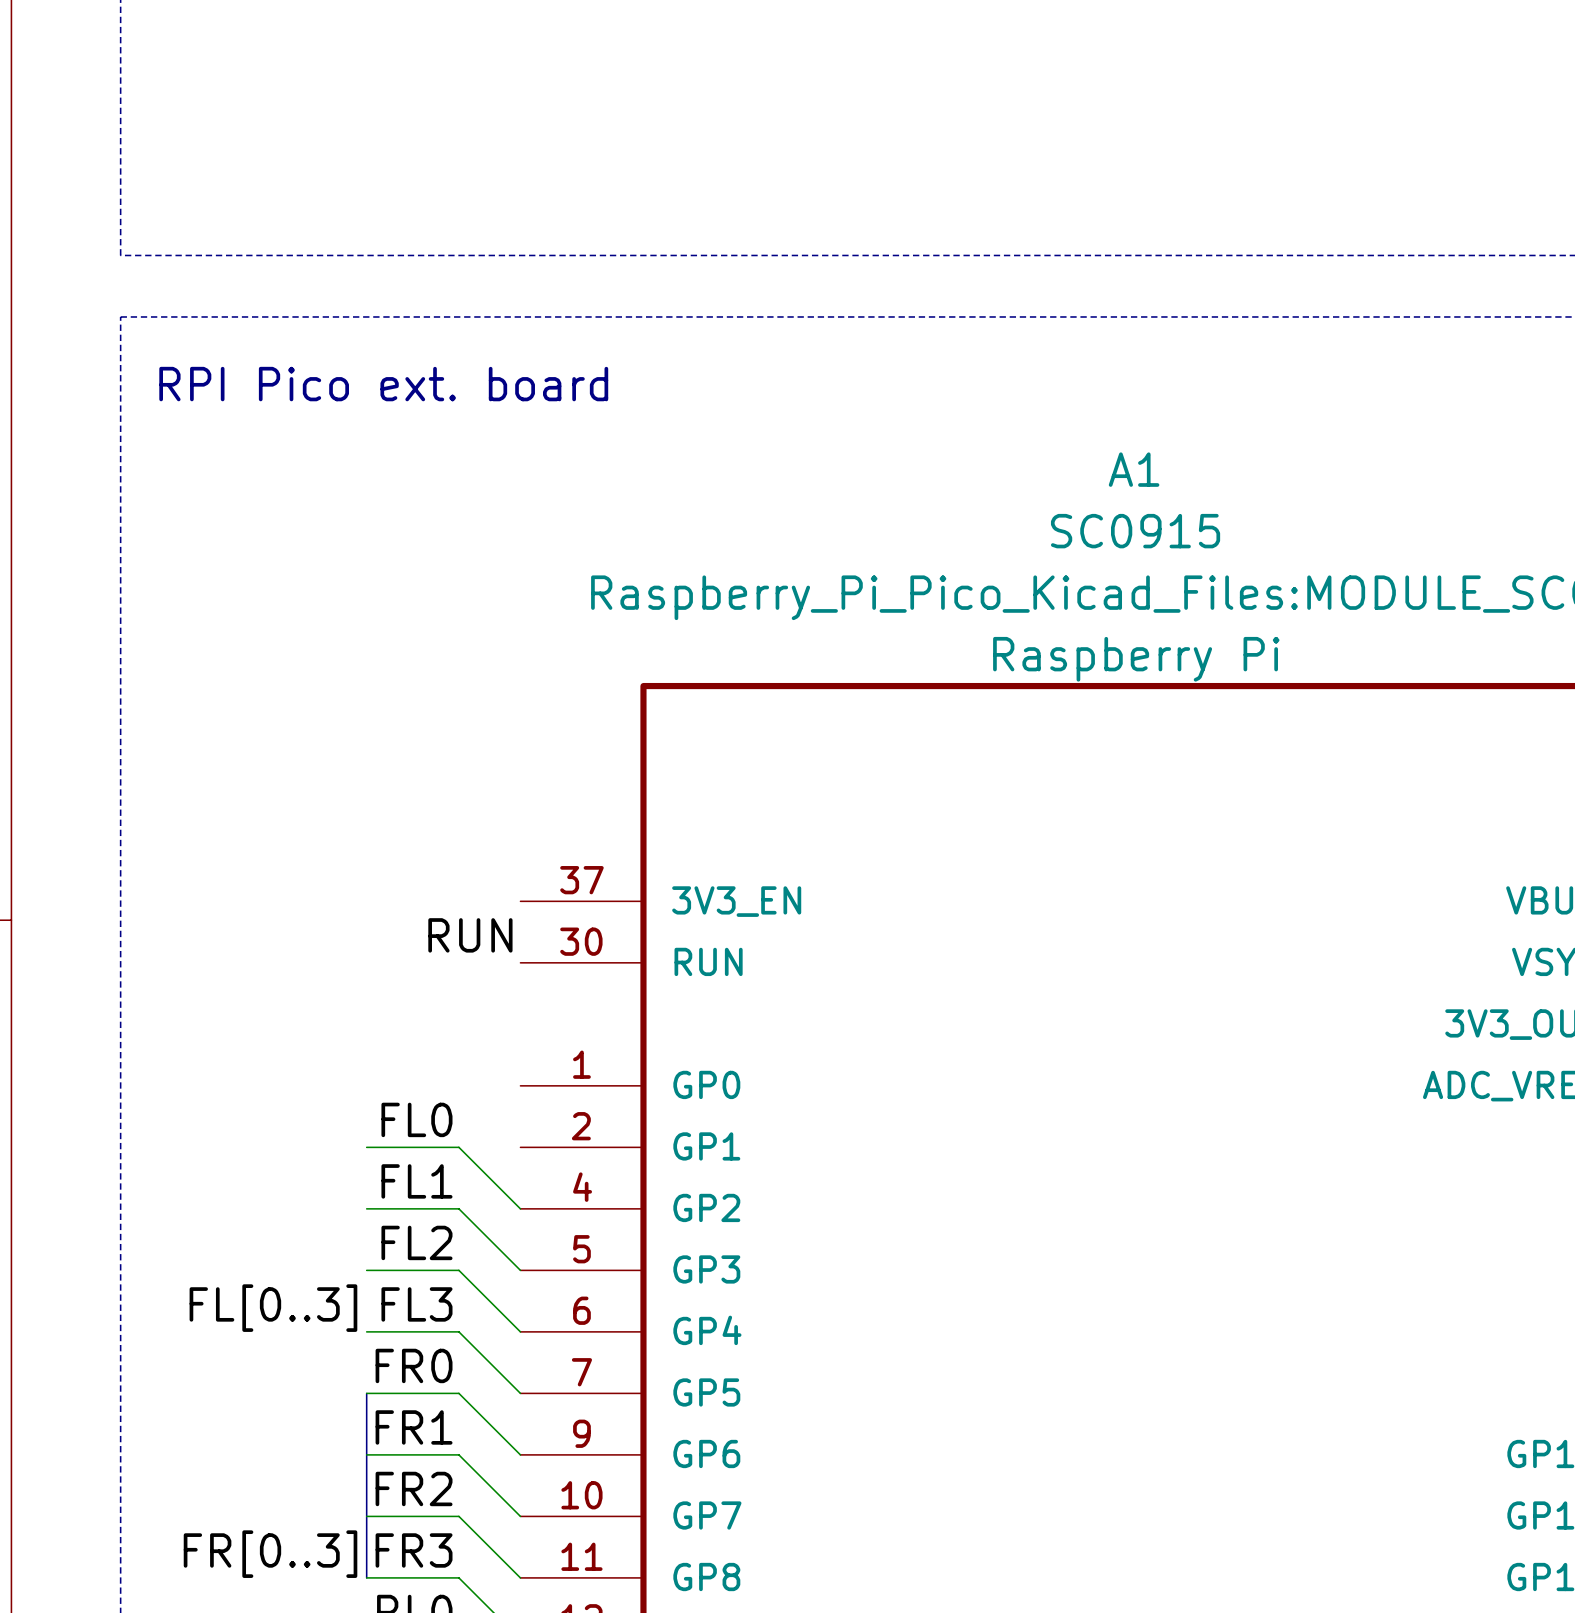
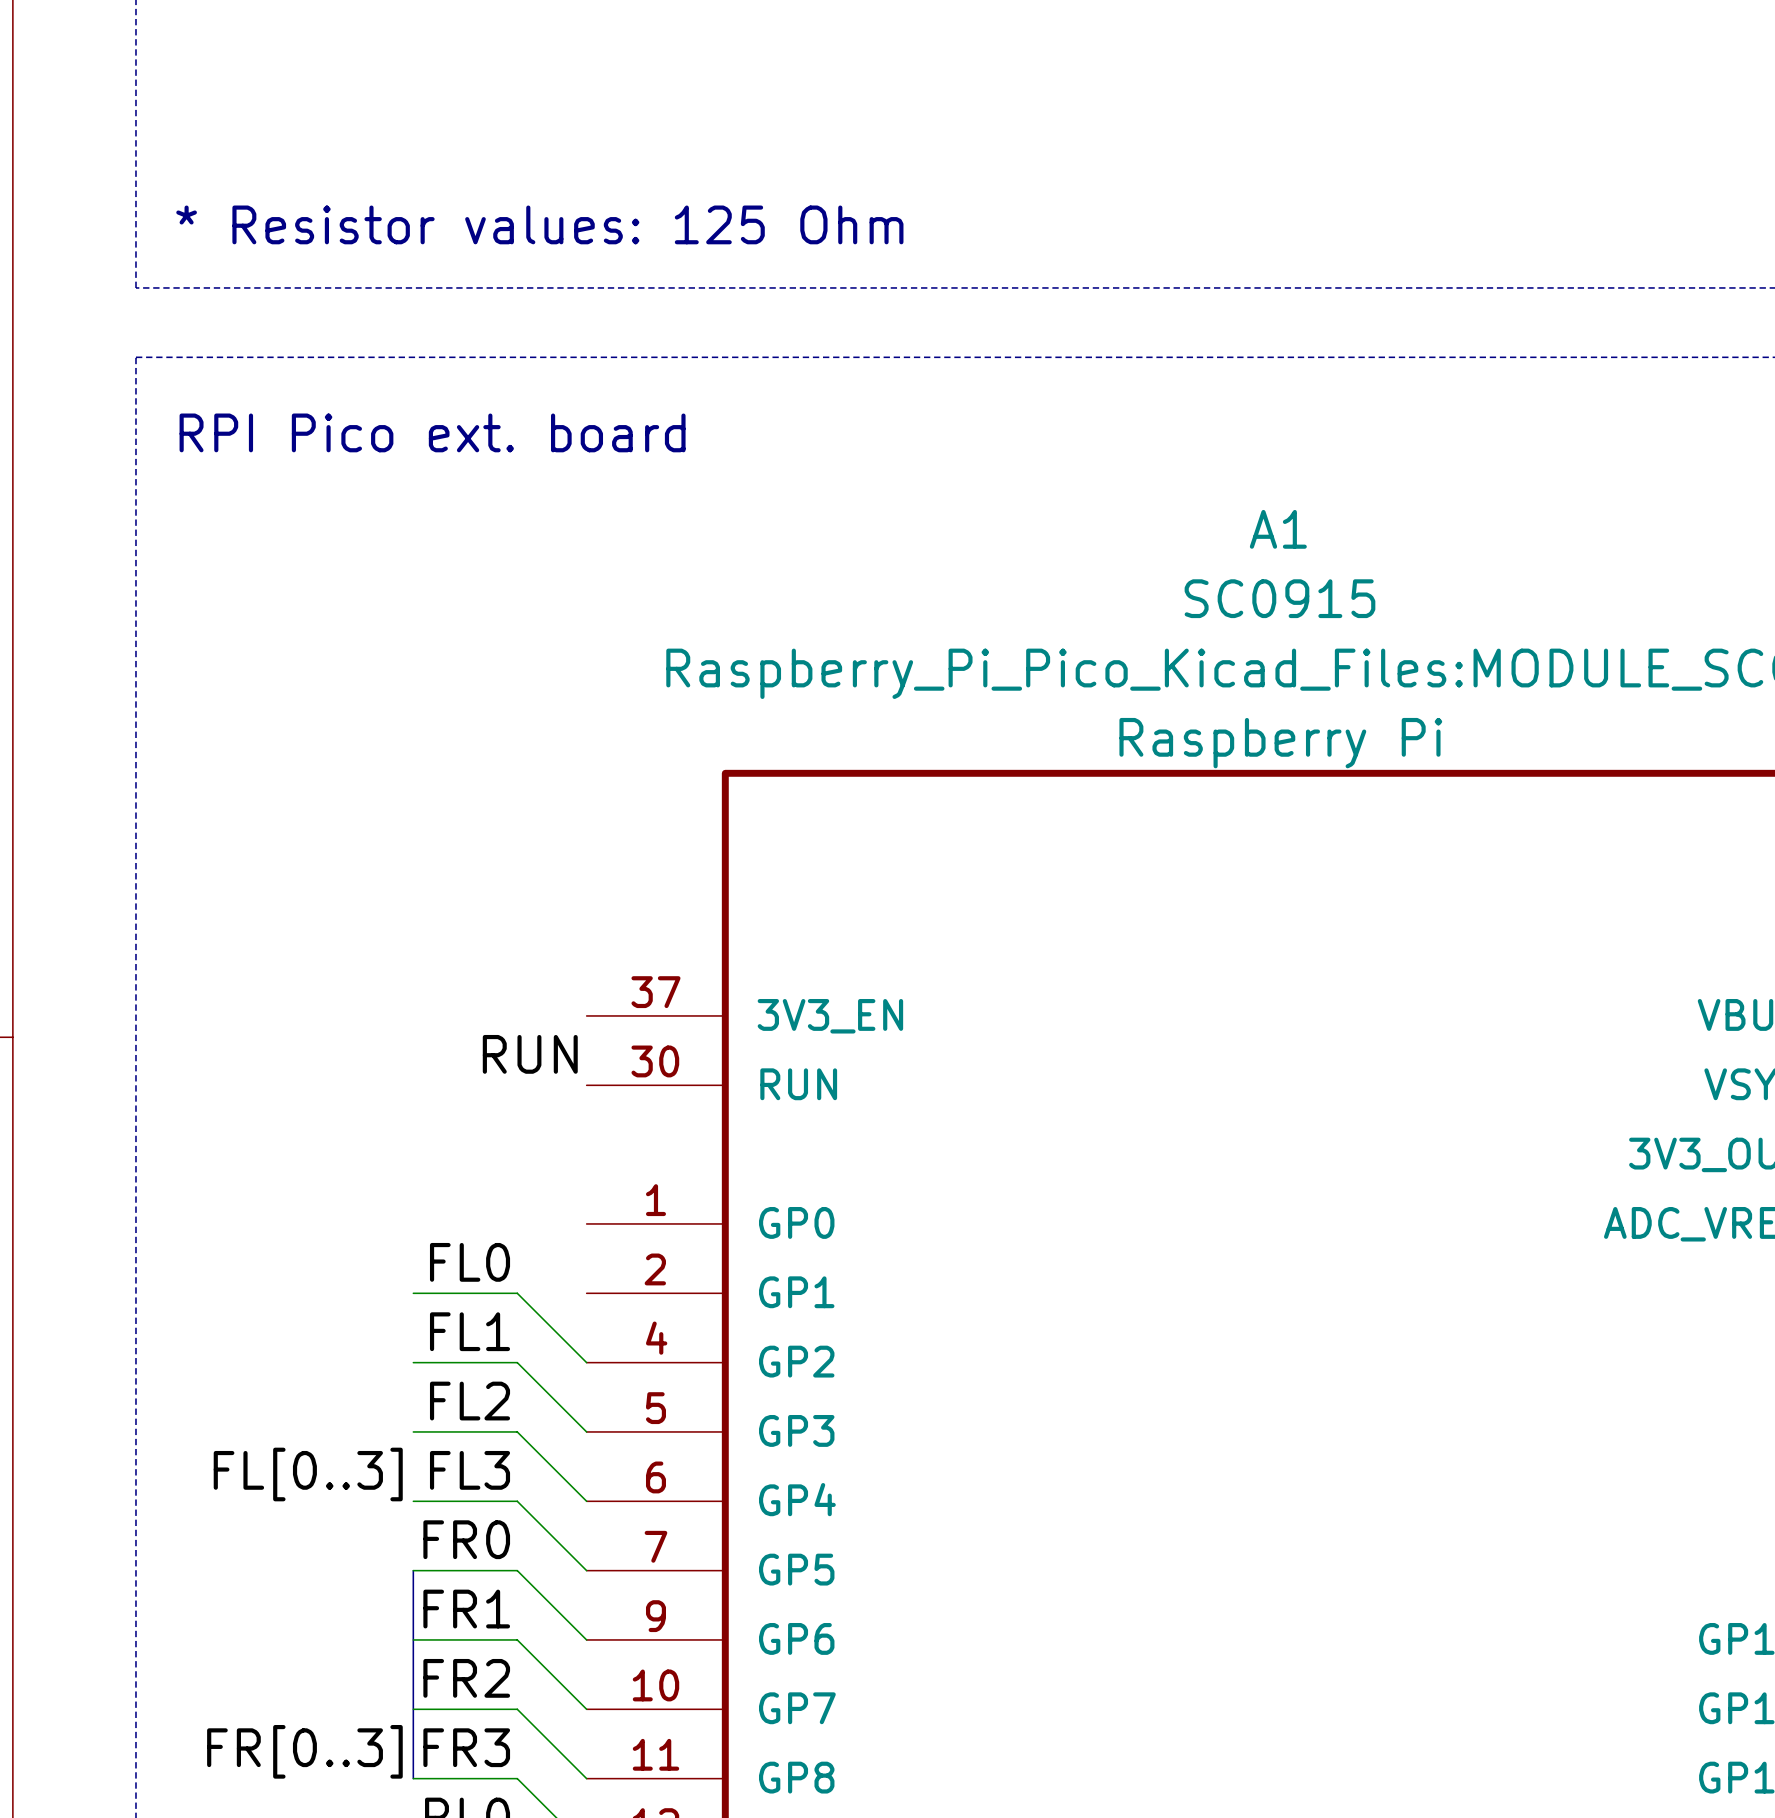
text: none -> * Resistor values: 125 Ohm (539, 224)

